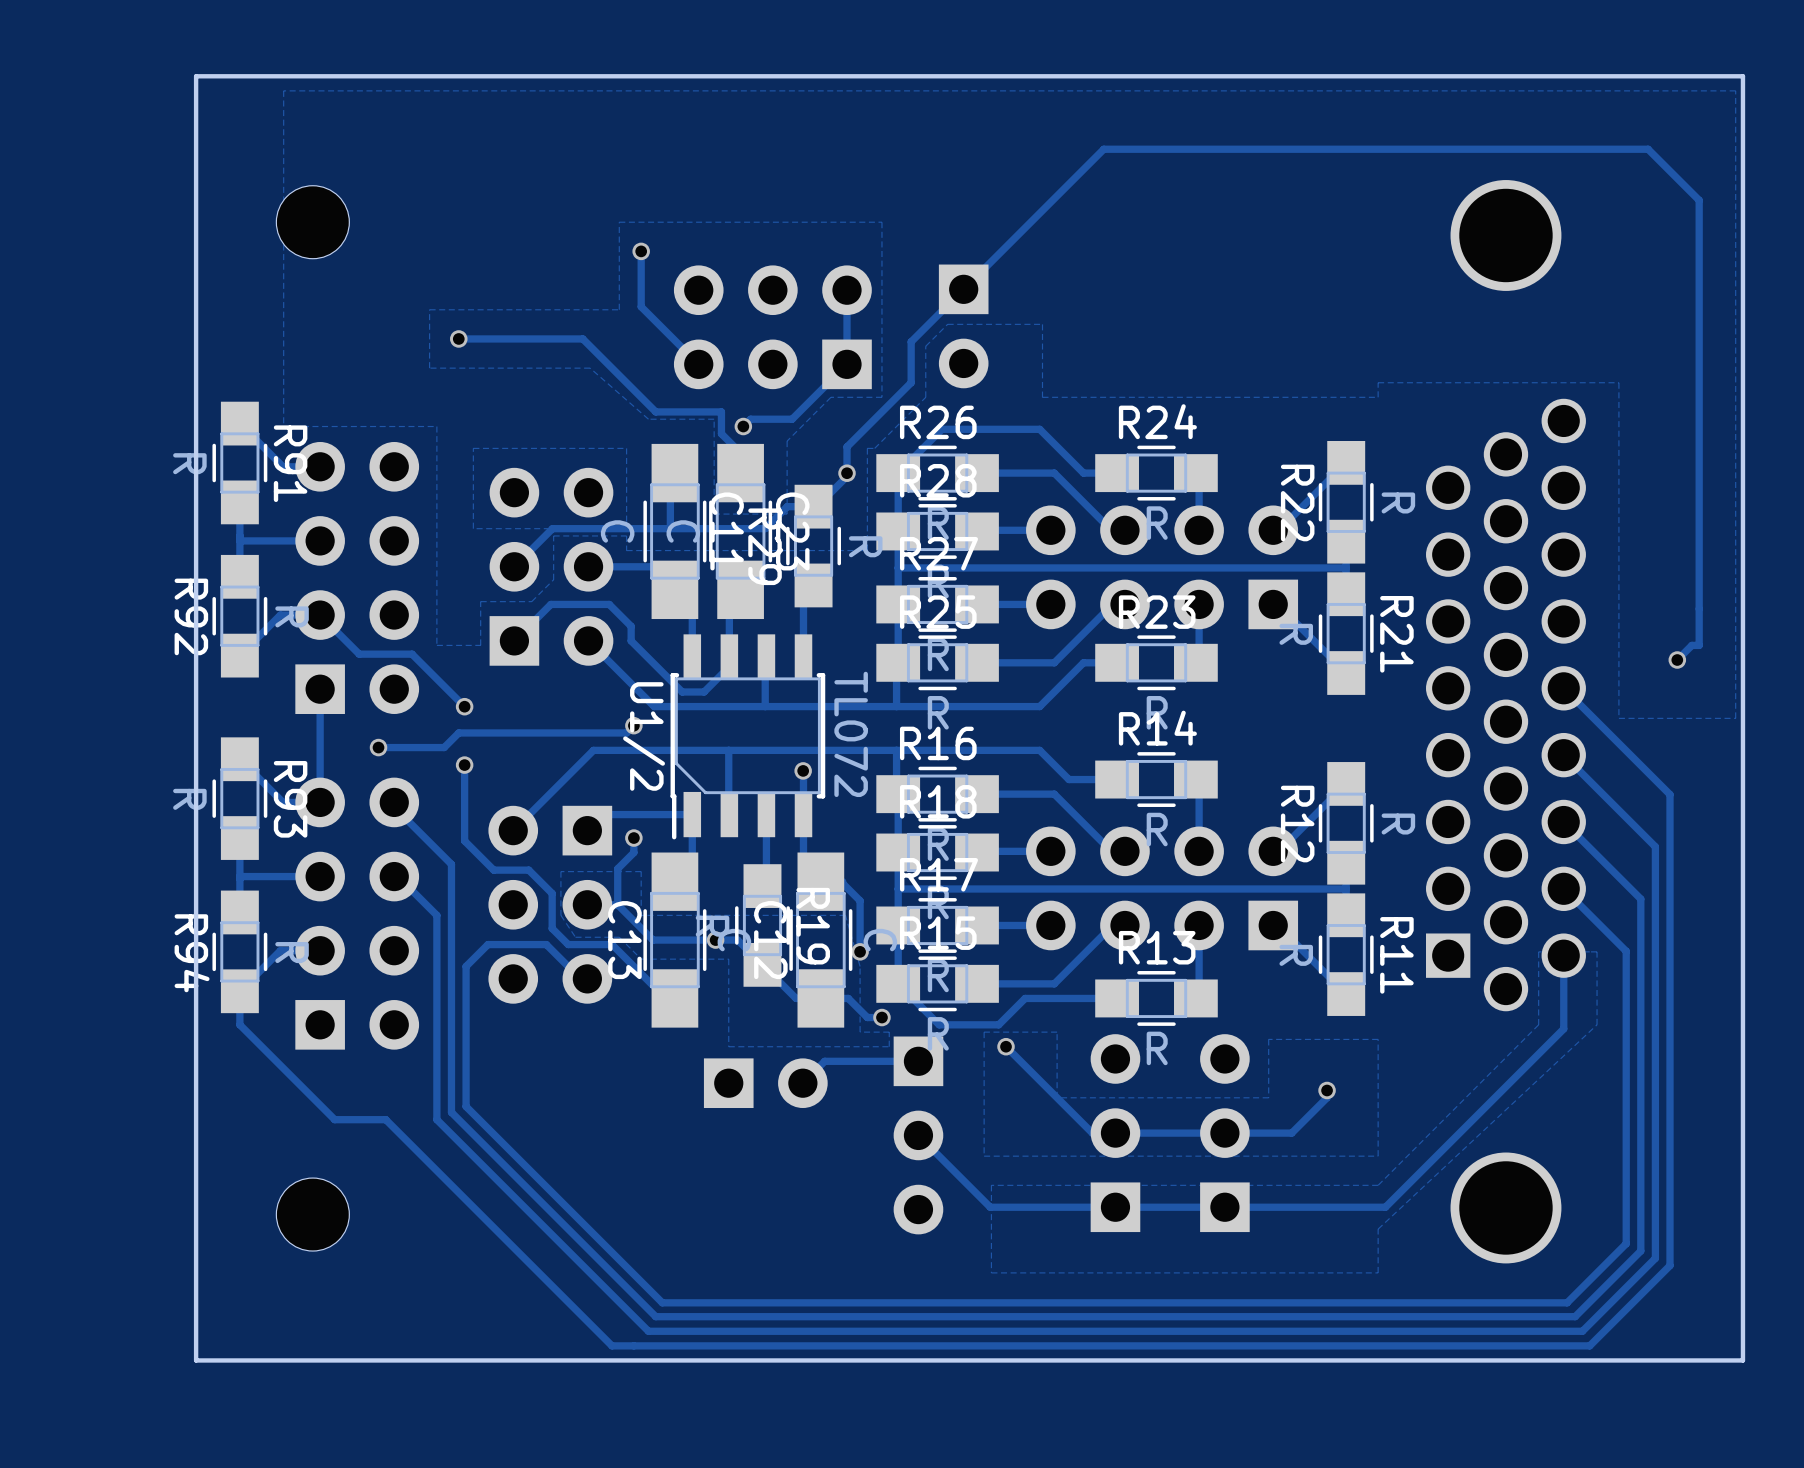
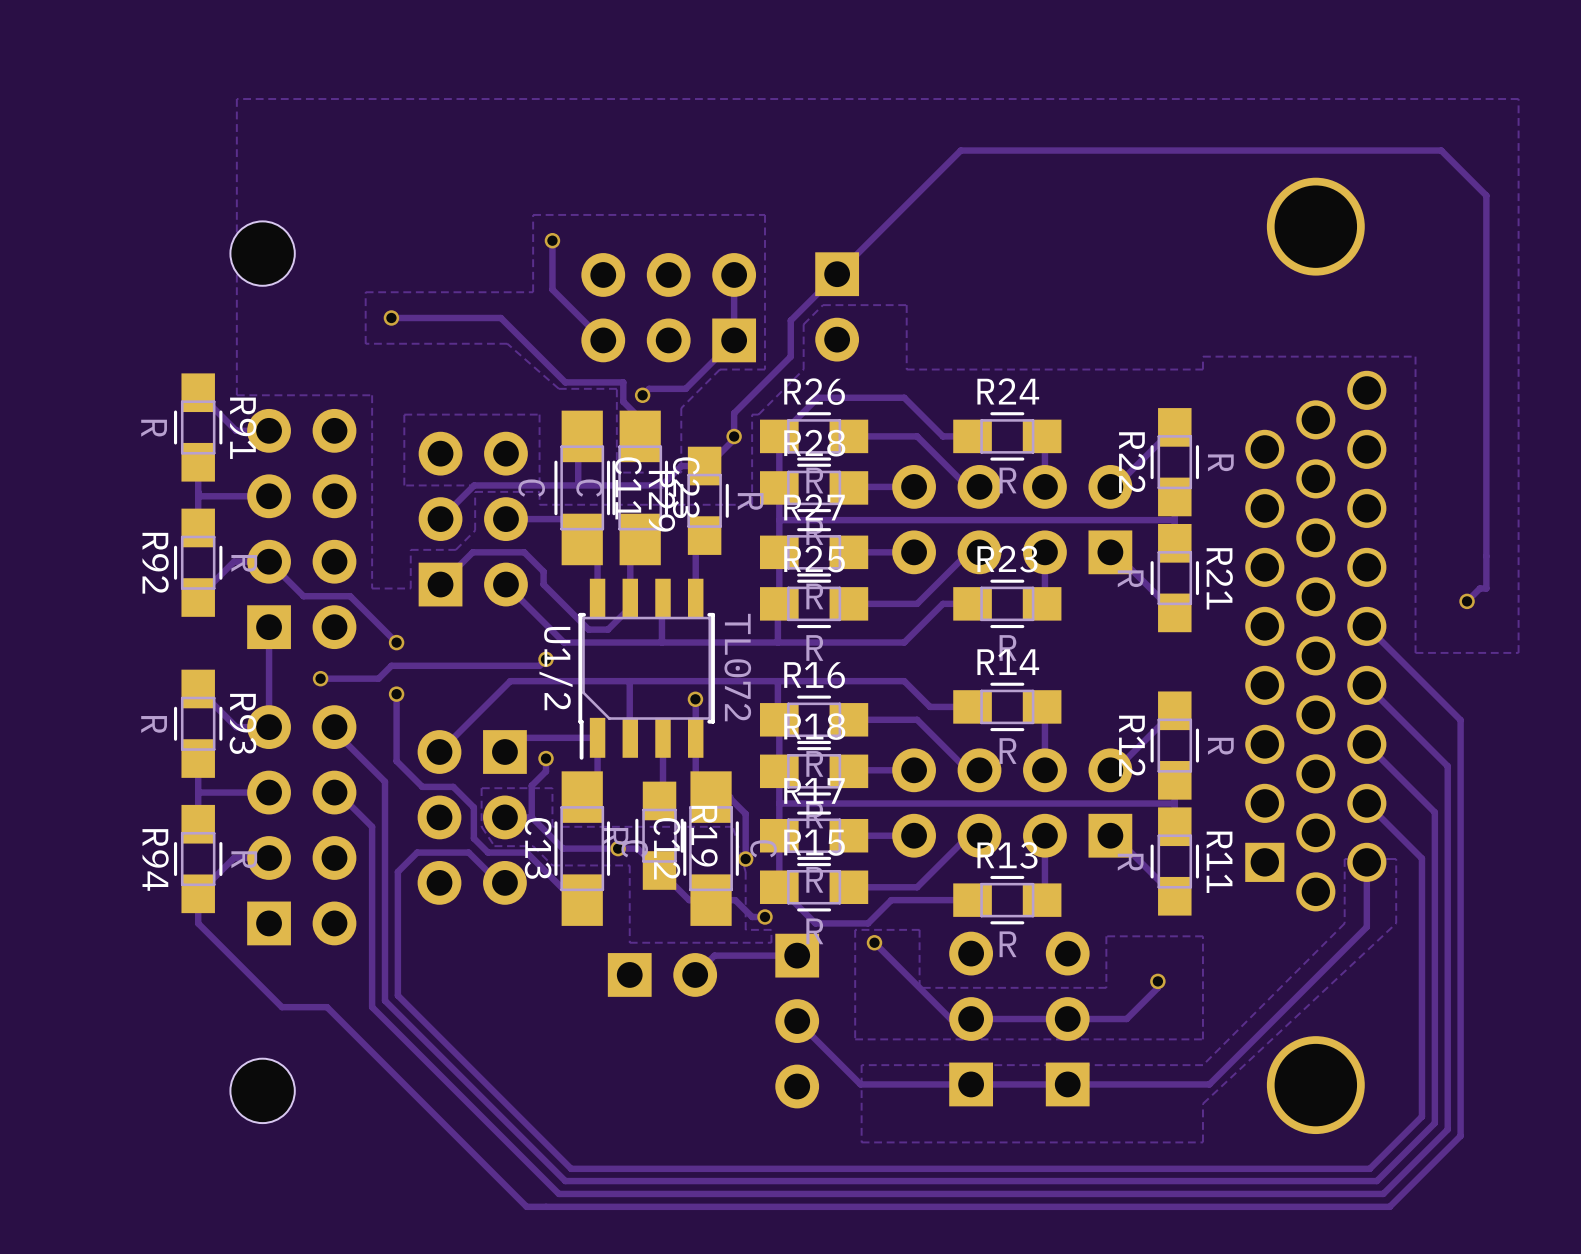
board edge: (1742, 76) (1742, 1360) (196, 1360) (196, 76) (1742, 76) -> none
part position: (312, 222) -> (262, 253)

